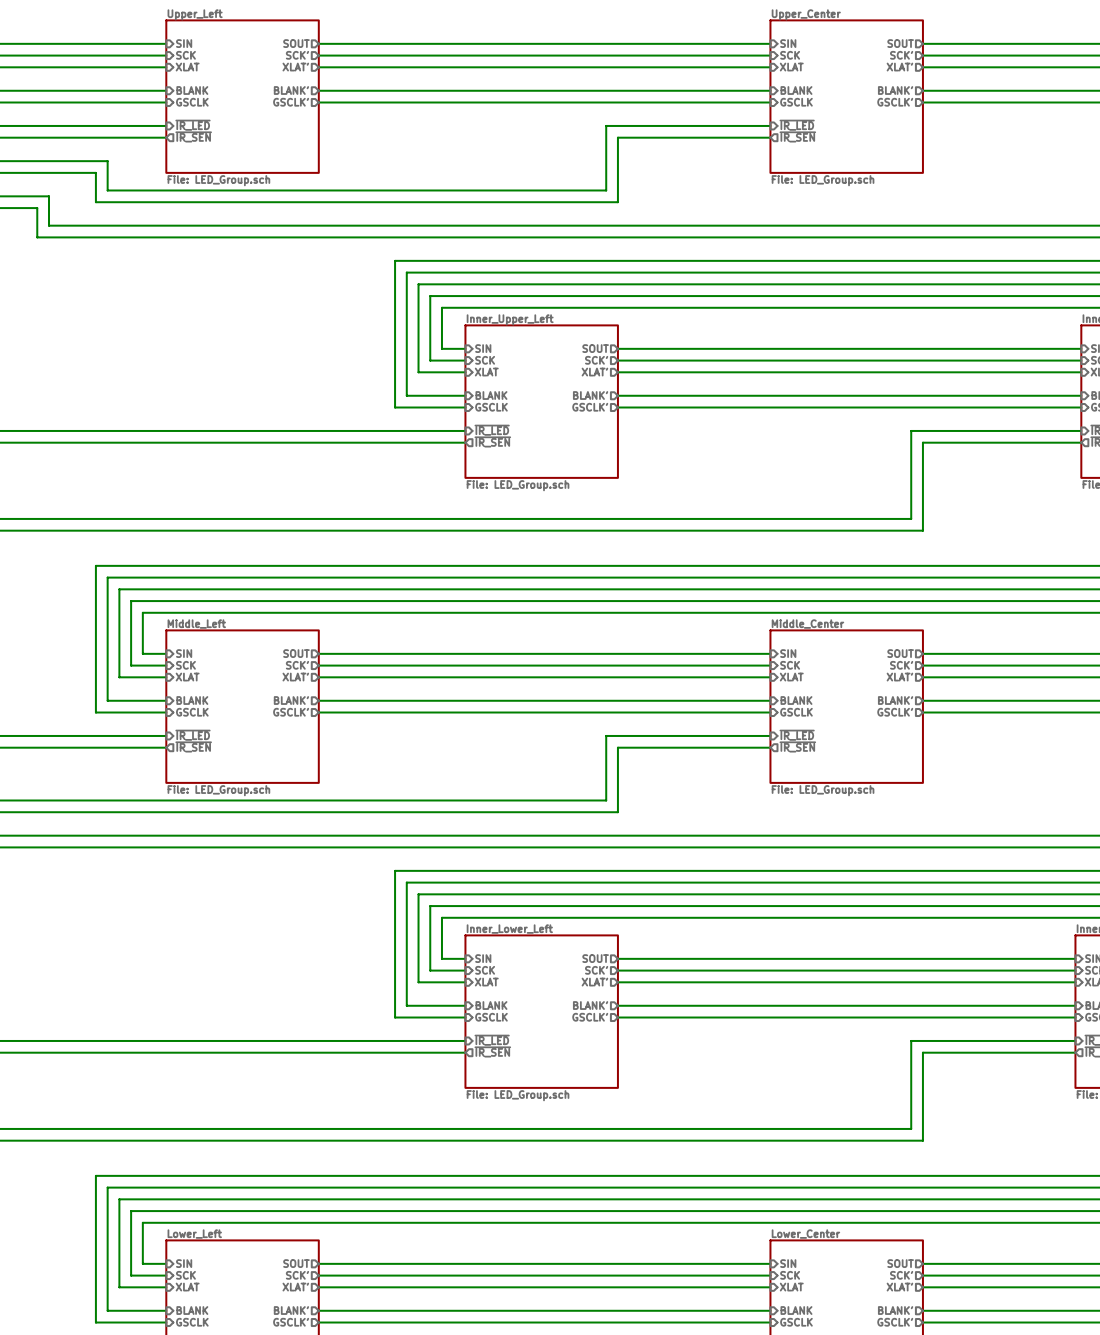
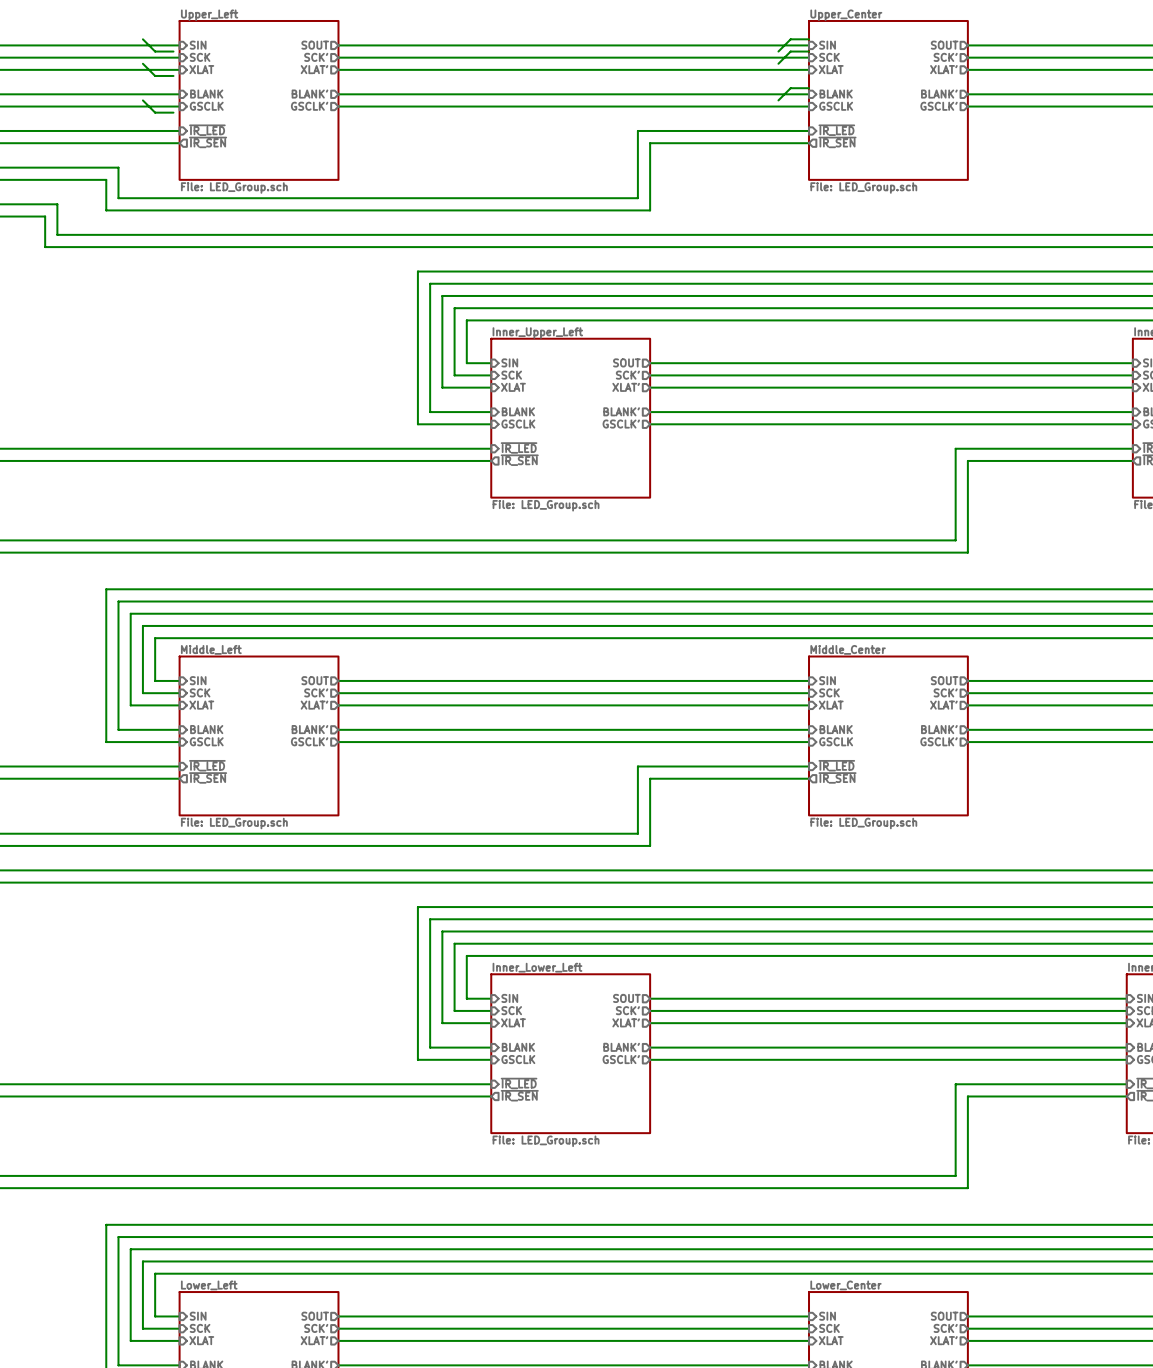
wire: none -> (142, 39) (155, 51) (173, 51)
wire: none -> (809, 39) (790, 39) (778, 51)
wire: none -> (809, 51) (790, 51) (778, 63)
wire: none -> (142, 63) (155, 75) (173, 75)
wire: none -> (809, 88) (790, 88) (778, 100)
wire: none -> (142, 100) (155, 112) (173, 112)

